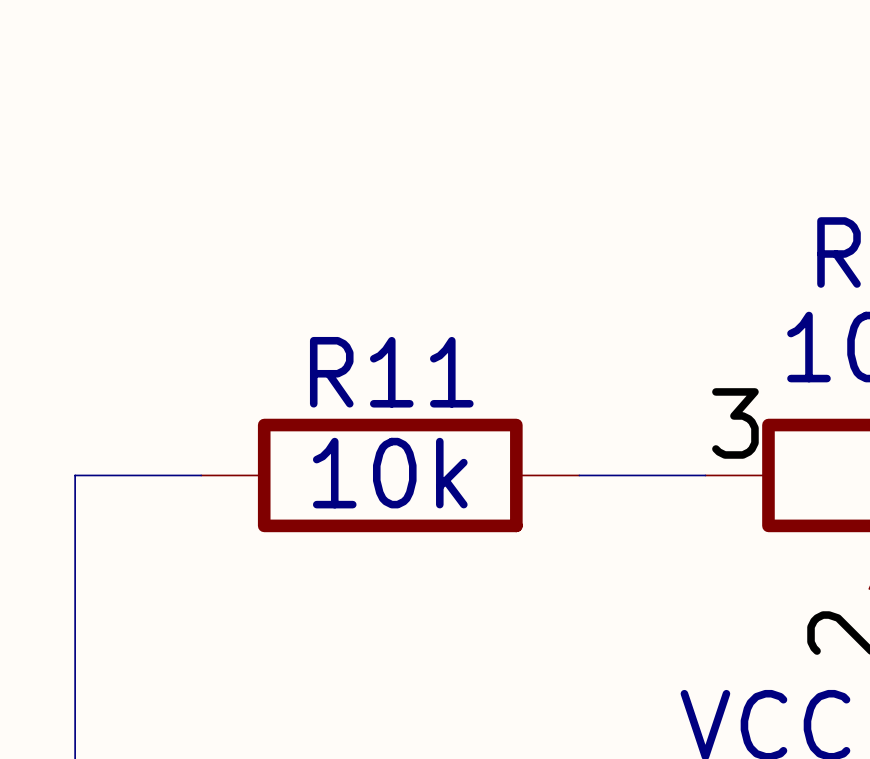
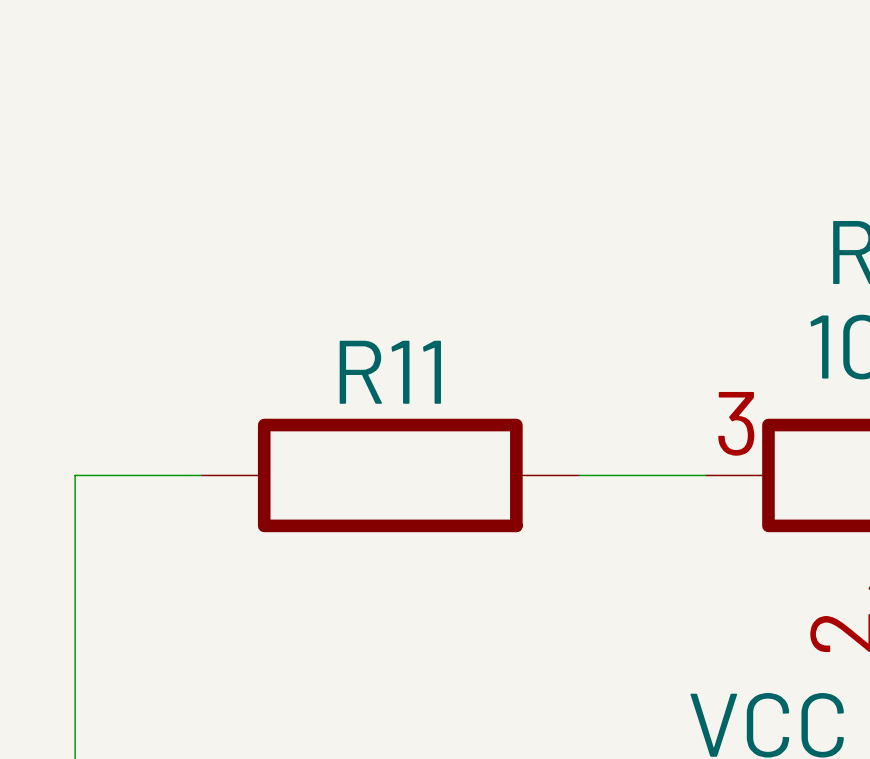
R11 value: 10k (390, 473) -> none

